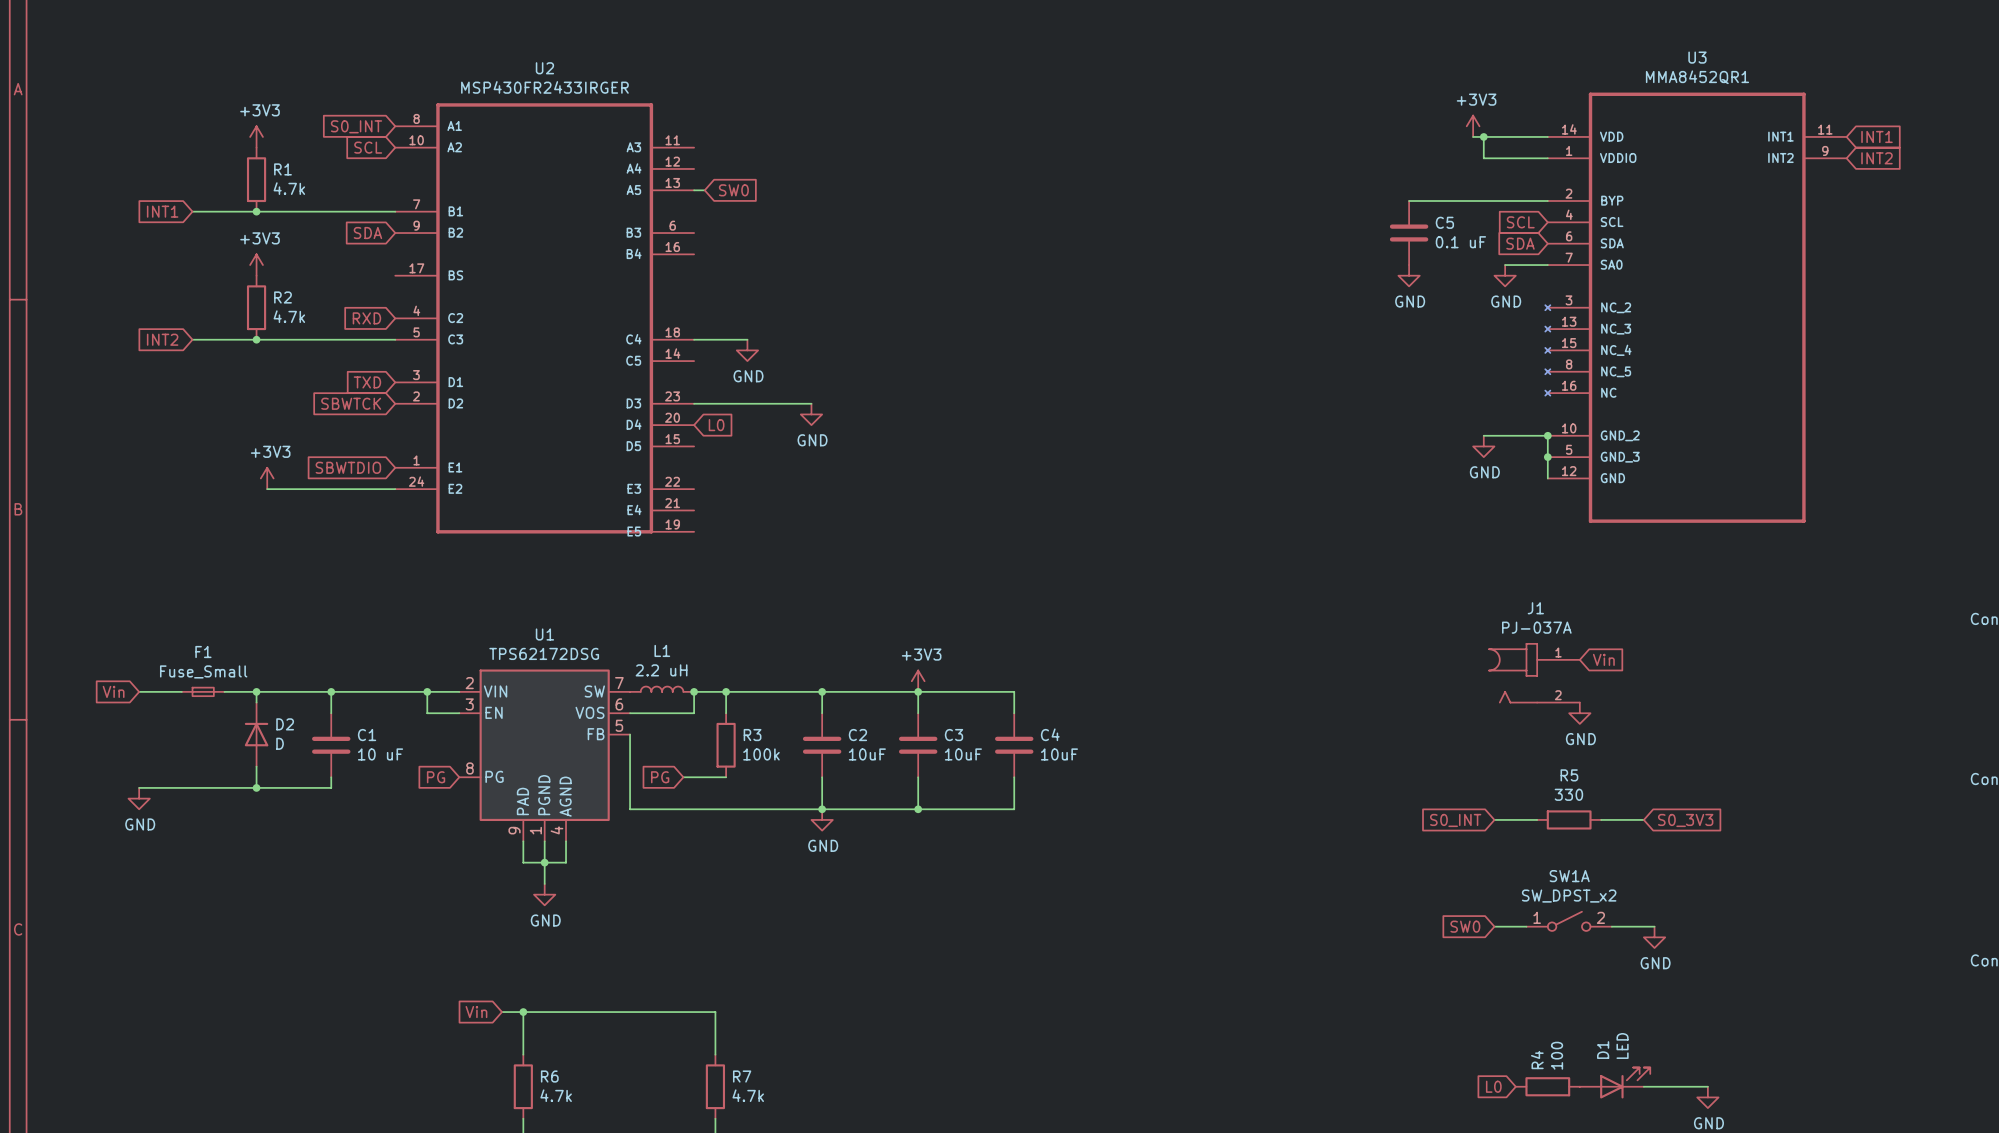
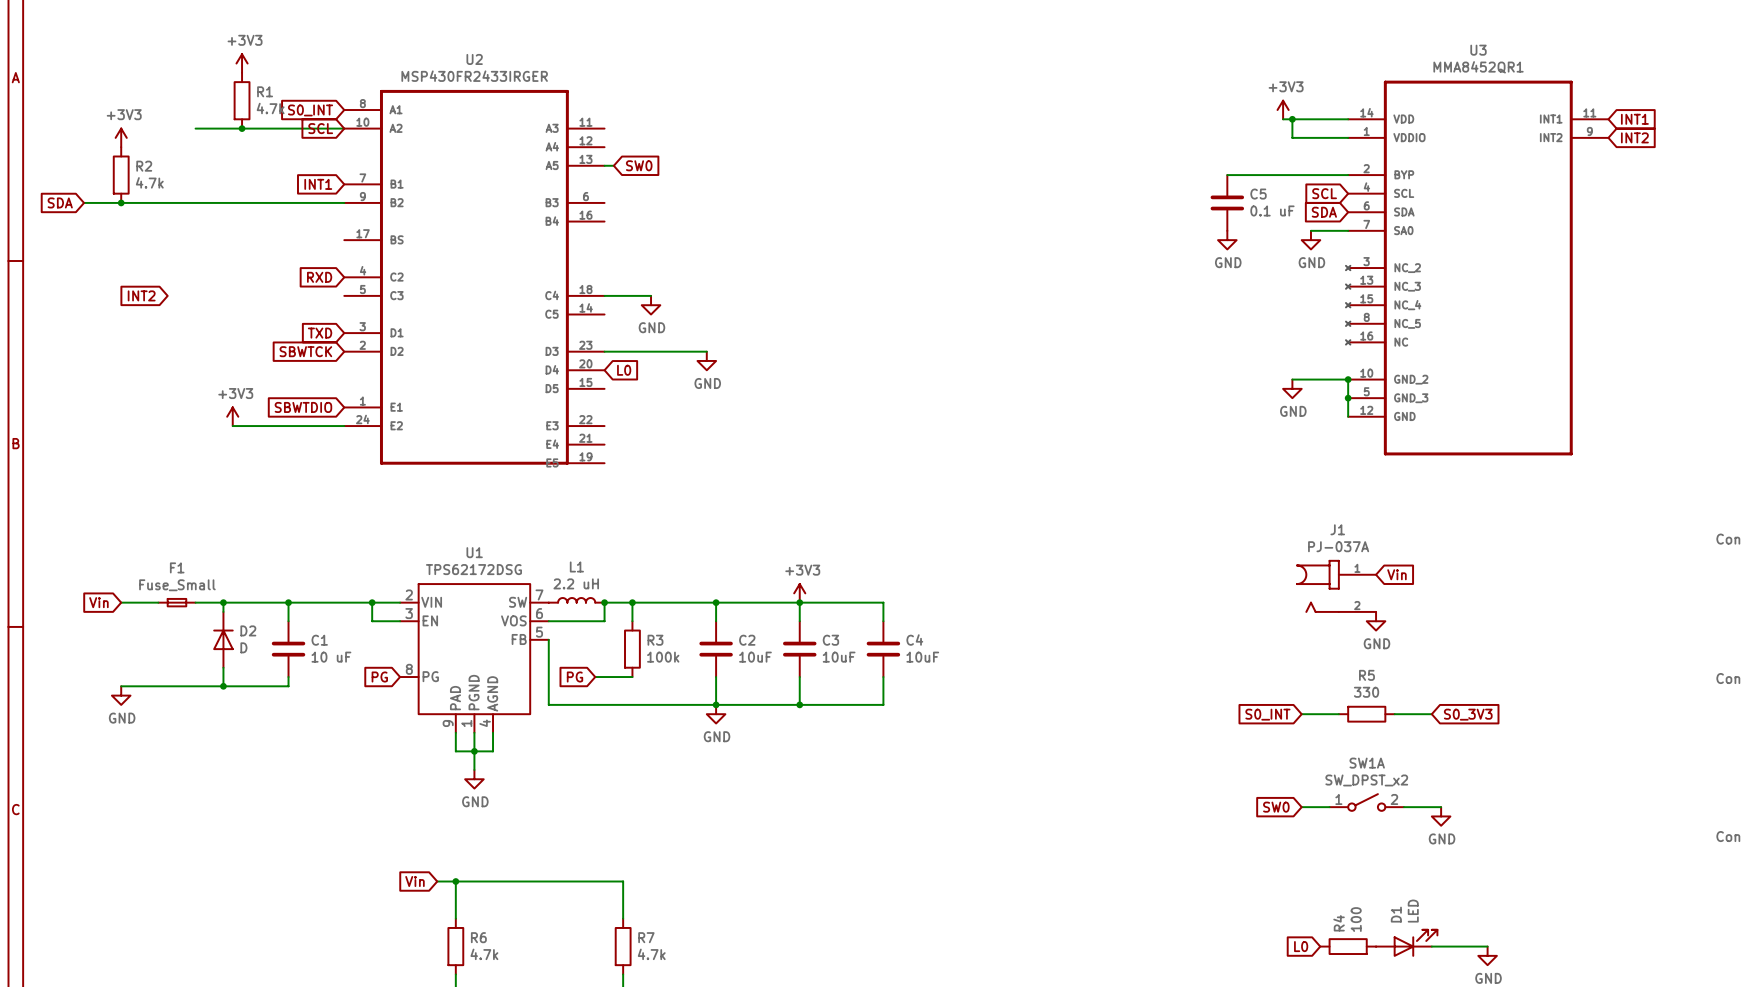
power symbol: none -> +3V3 (242, 63)
power symbol: +3V3 (256, 136) -> none
wire: none -> (195, 128) (344, 128)
junction: none -> (242, 128)
power symbol: none -> +3V3 (121, 137)
R1 position: (256, 179) -> (242, 100)
global label position: INT1 (162, 211) -> INT1 (318, 184)
wire: (192, 211) (395, 211) -> none
junction: (256, 211) -> none
global label: none -> SDA (60, 202)
wire: none -> (84, 202) (344, 202)
junction: none -> (121, 202)
global label: SDA (367, 233) -> none
power symbol: +3V3 (256, 265) -> none
R2 position: (256, 307) -> (121, 175)
wire: (192, 339) (395, 339) -> none
junction: (256, 339) -> none

